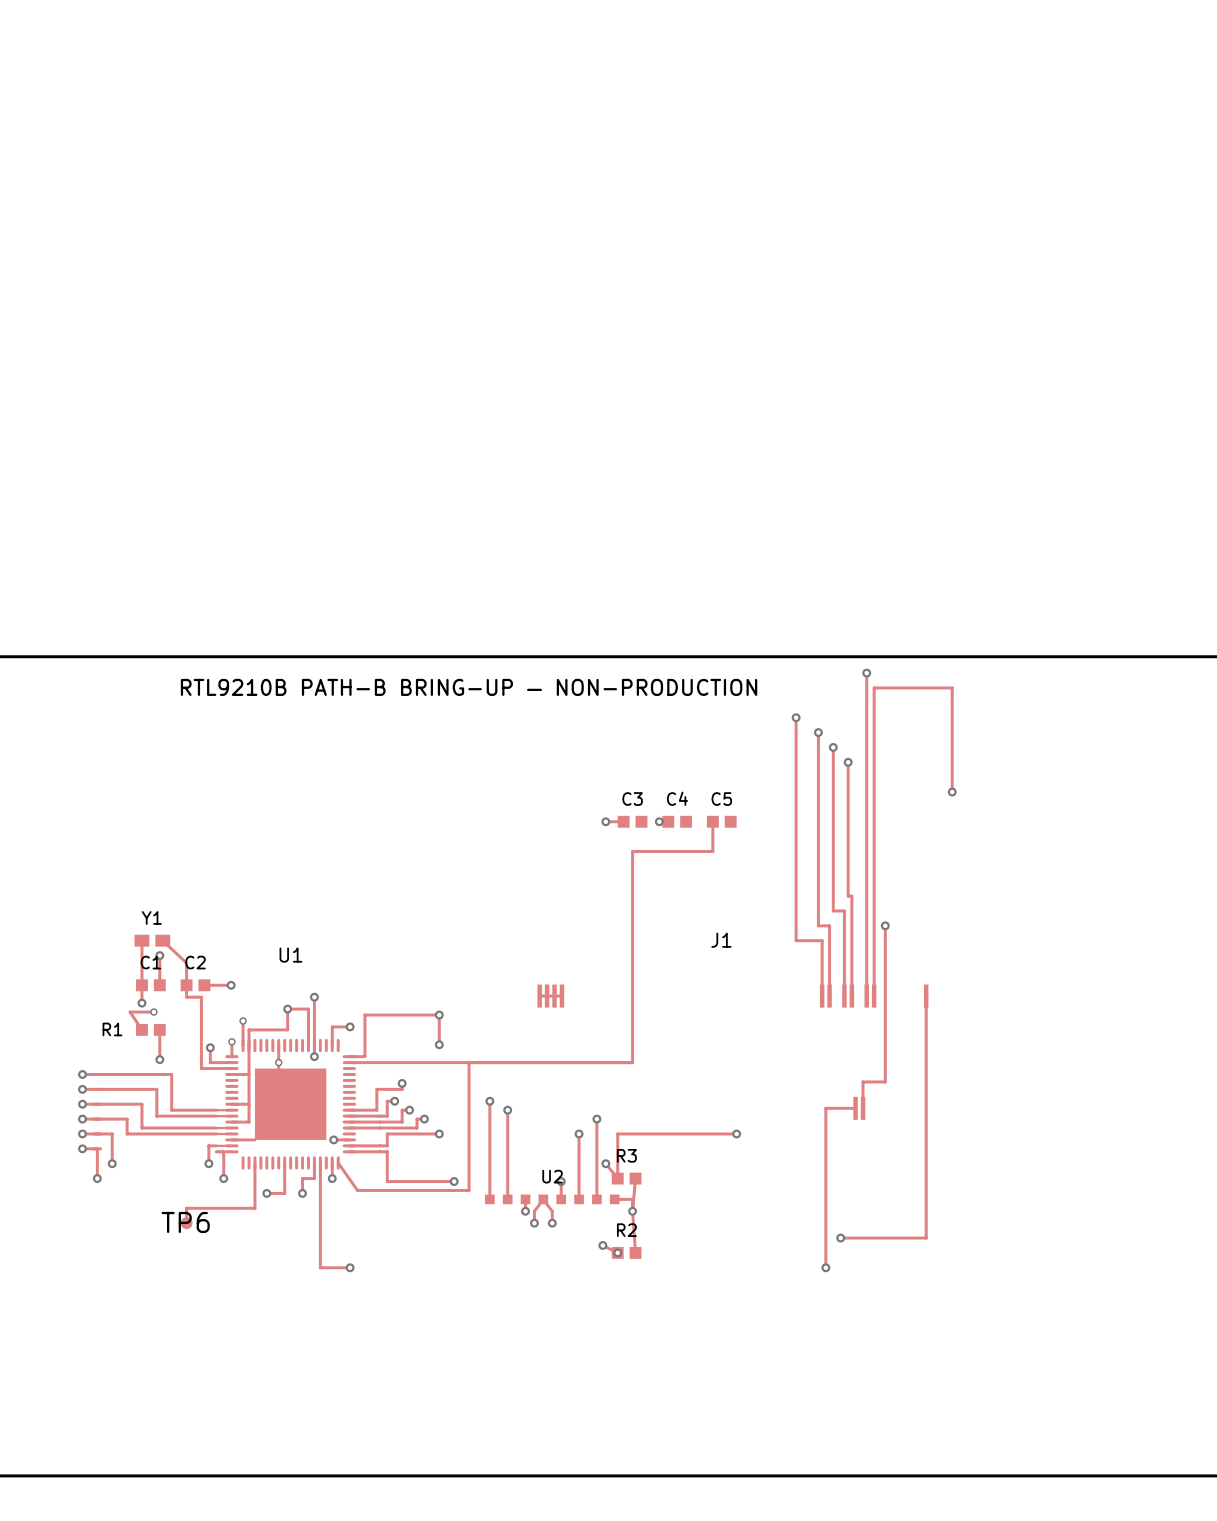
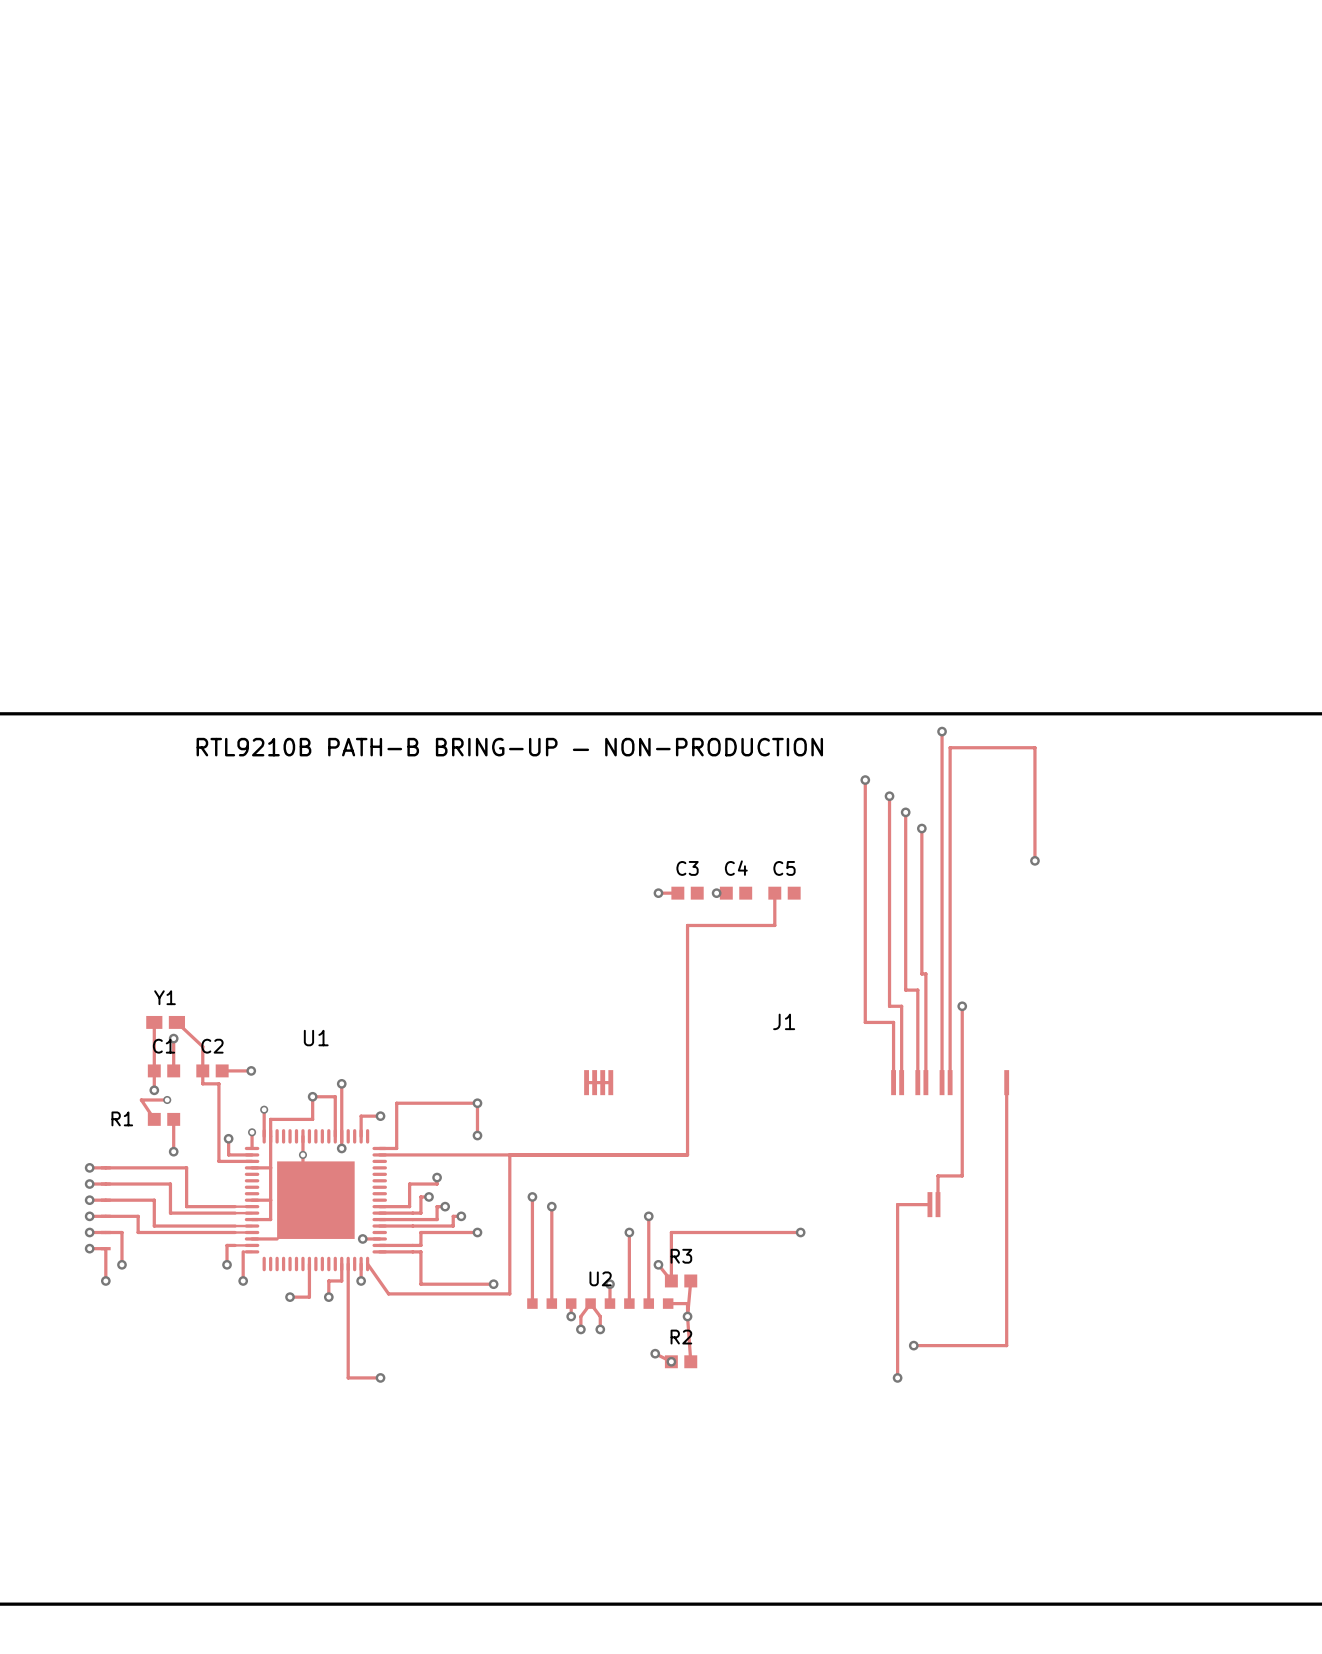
track: (216, 1151) (223, 1151) (216, 1151) -> none
track: (254, 1162) (254, 1208) (186, 1208) (186, 1223) -> none
TP6: (186, 1223) -> none

